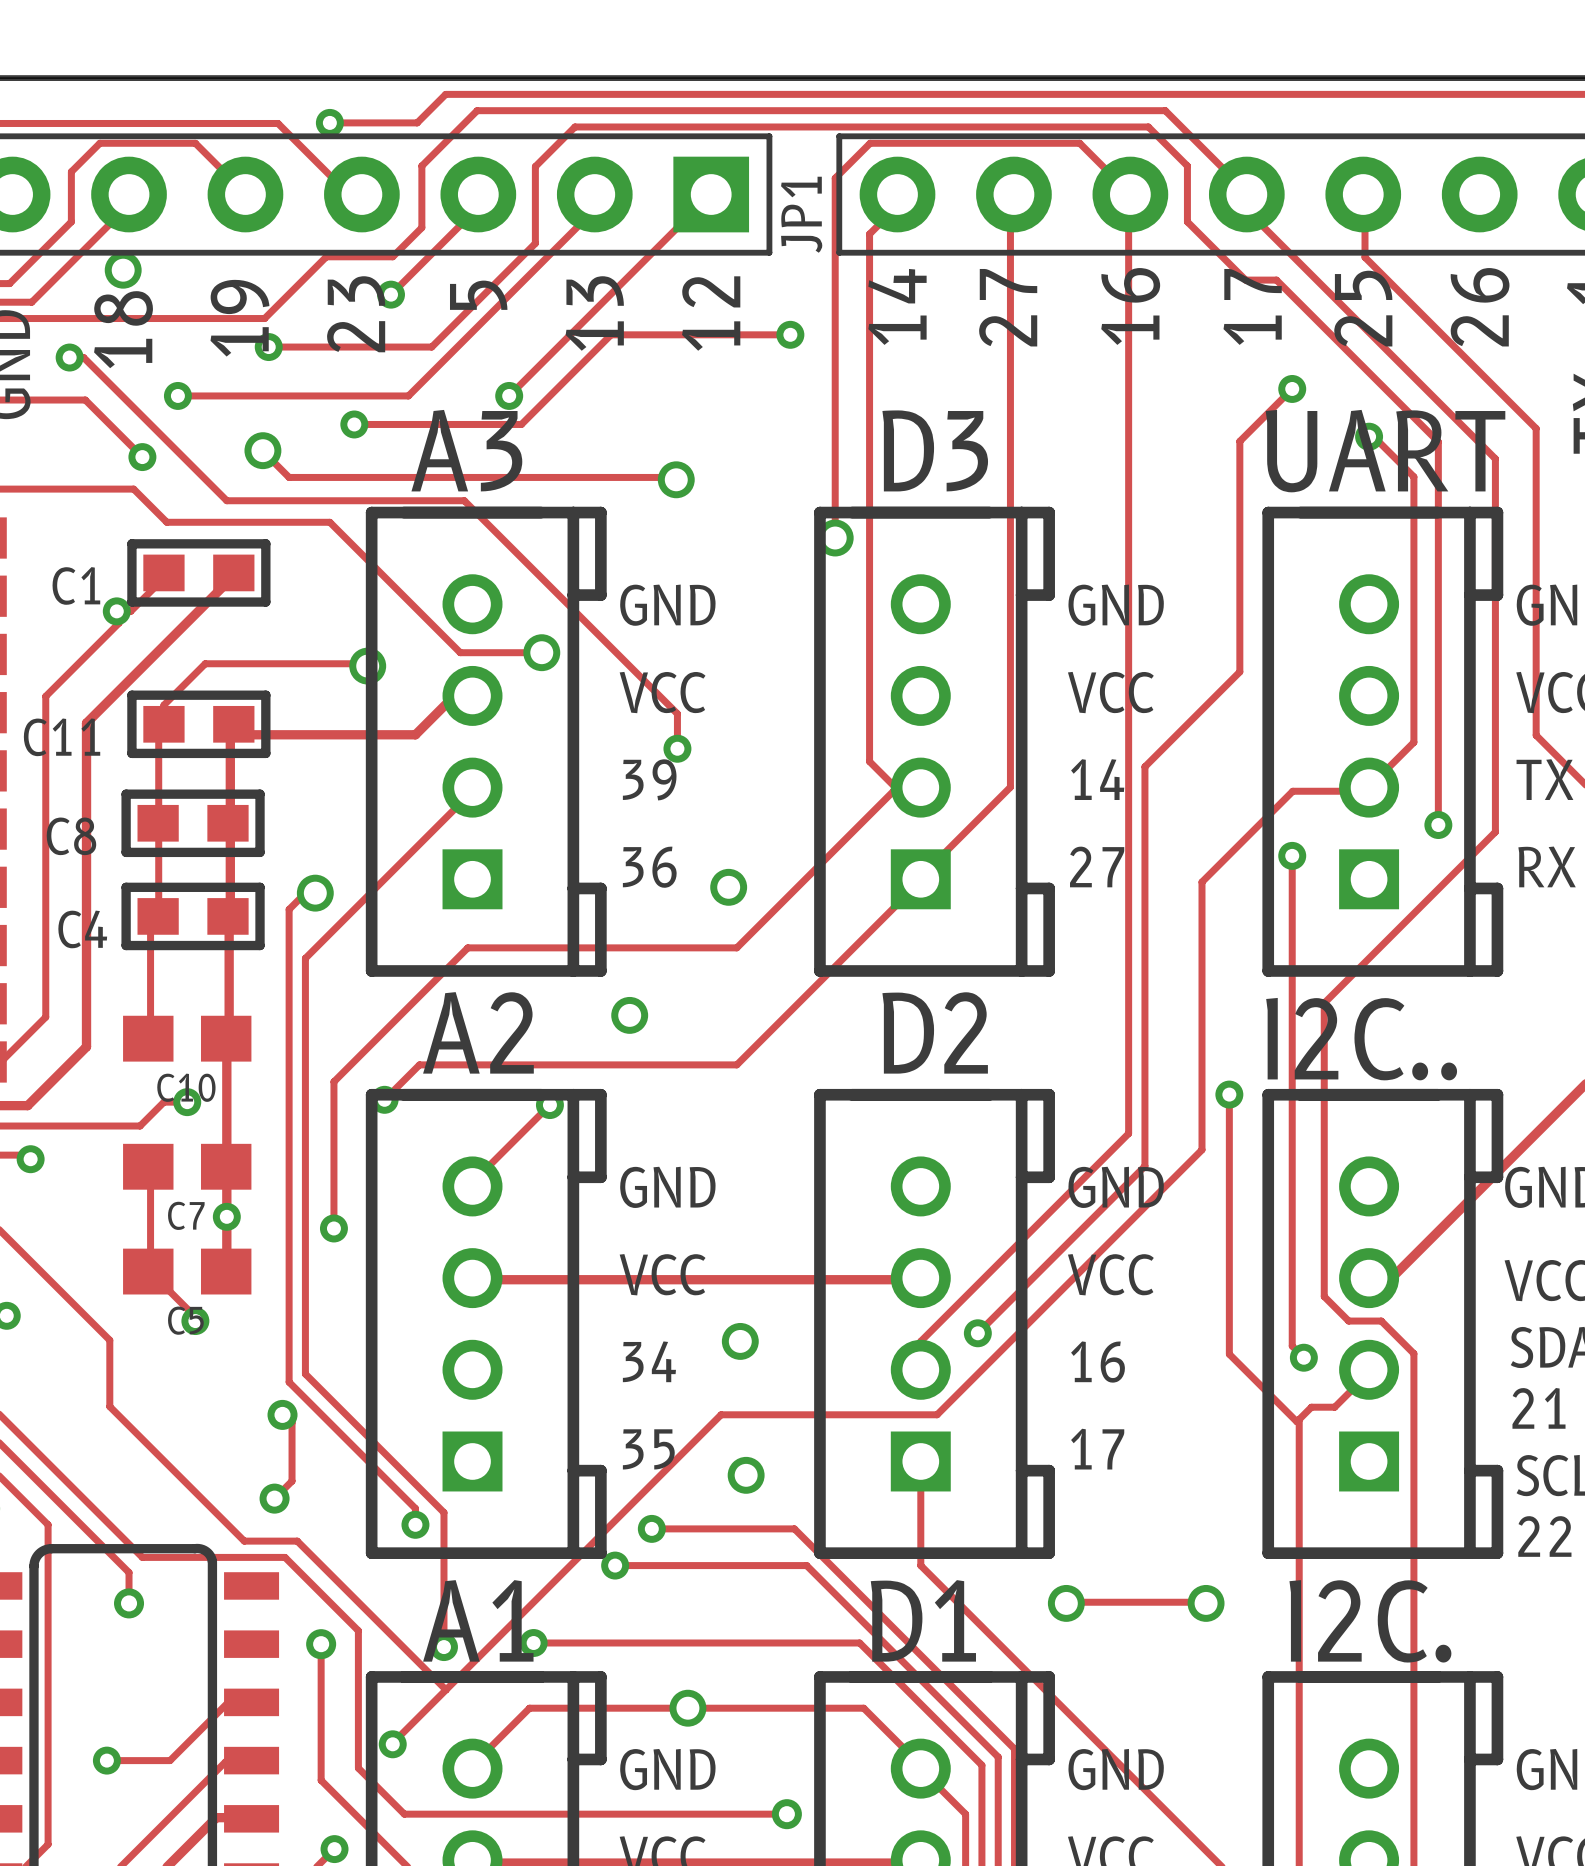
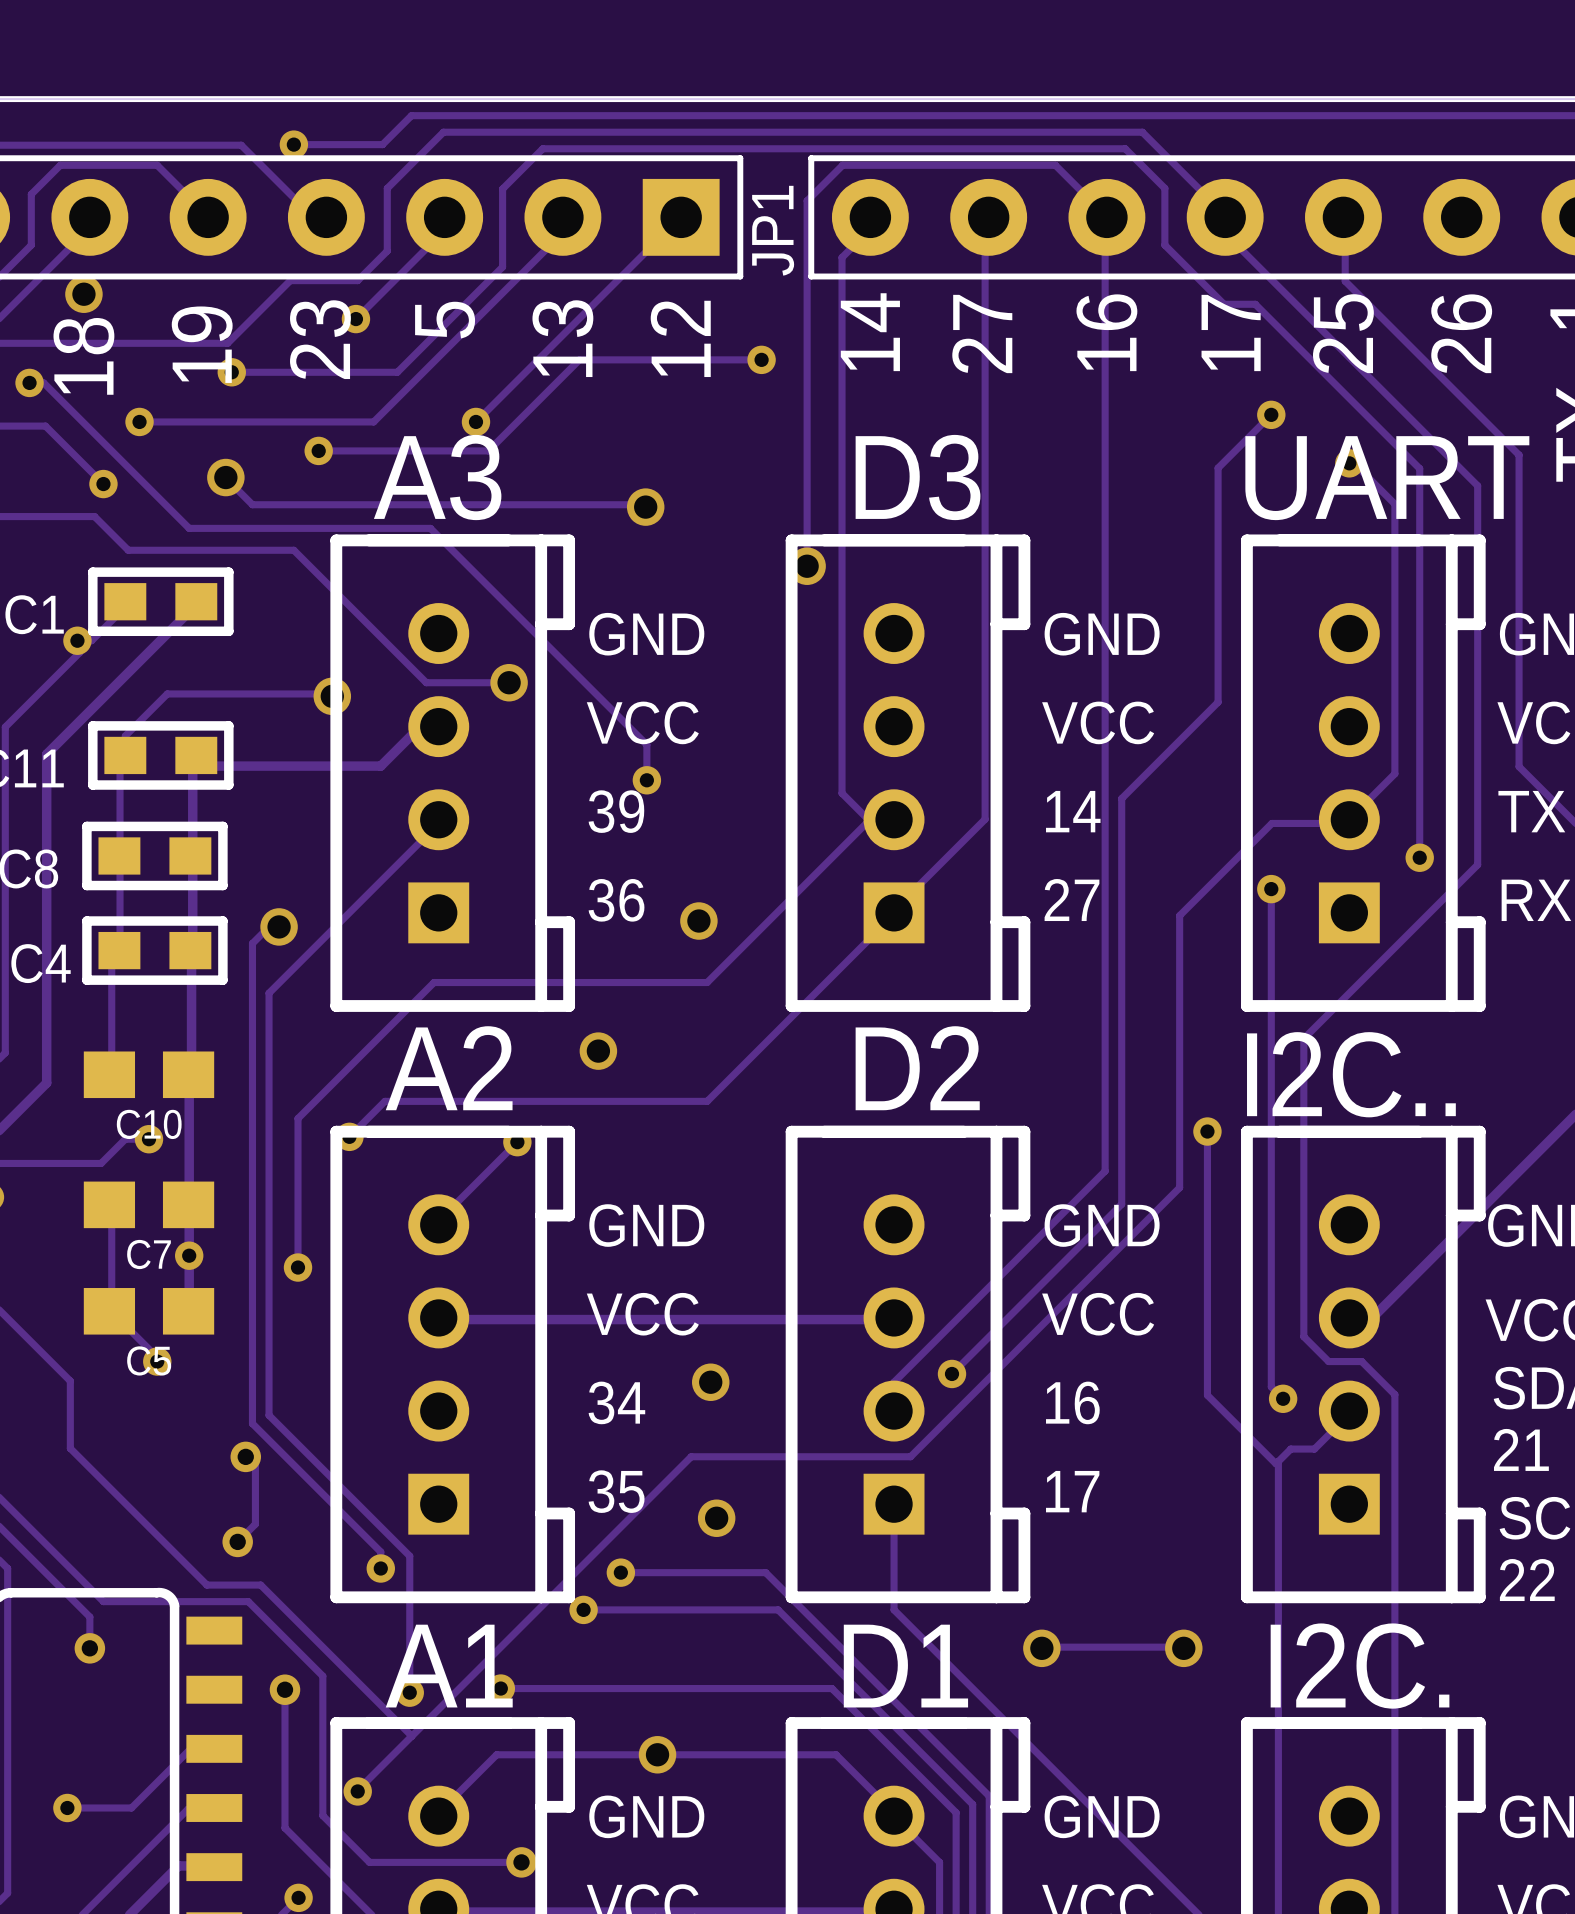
track: (554, 1814) (786, 1814) -> none
via position: (786, 1814) -> (521, 1862)

